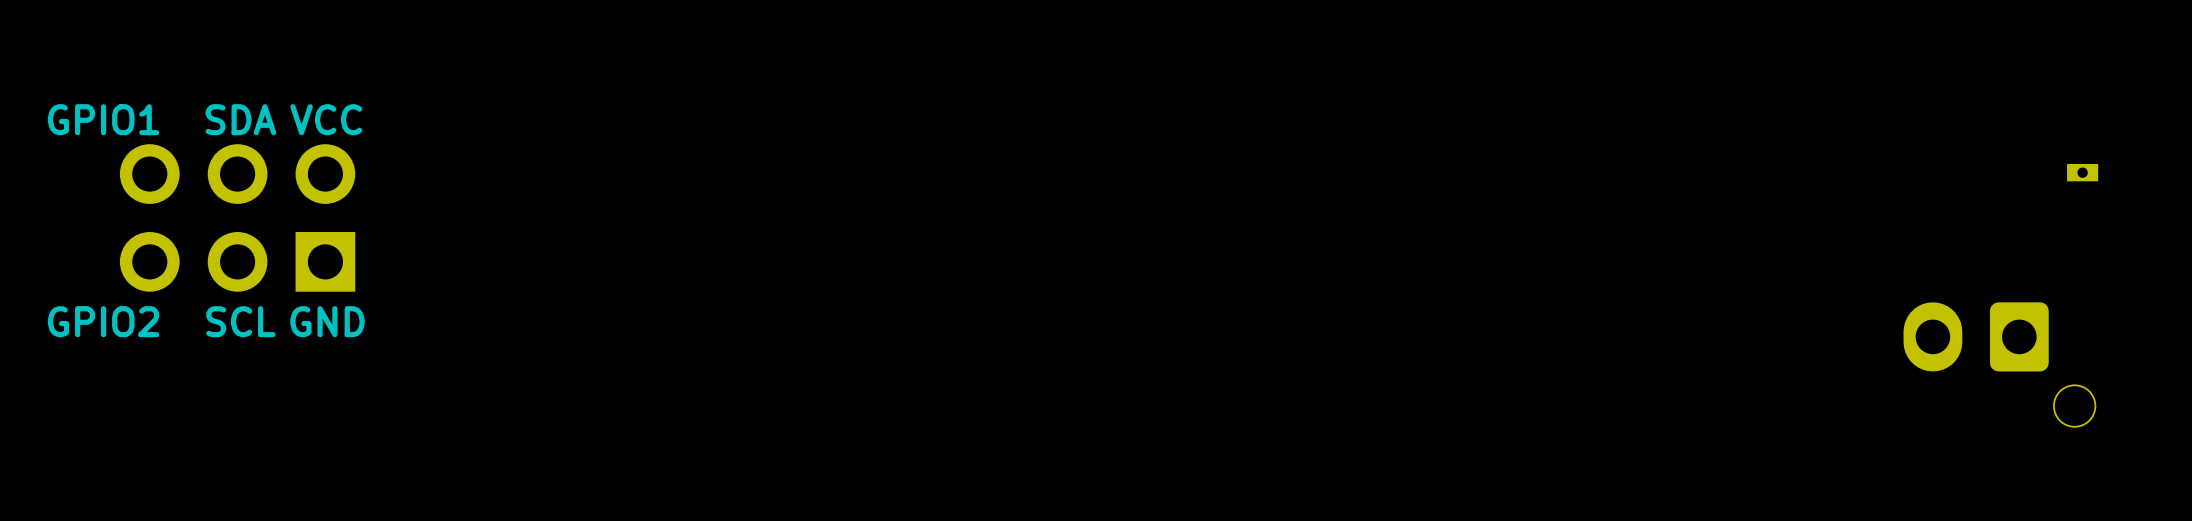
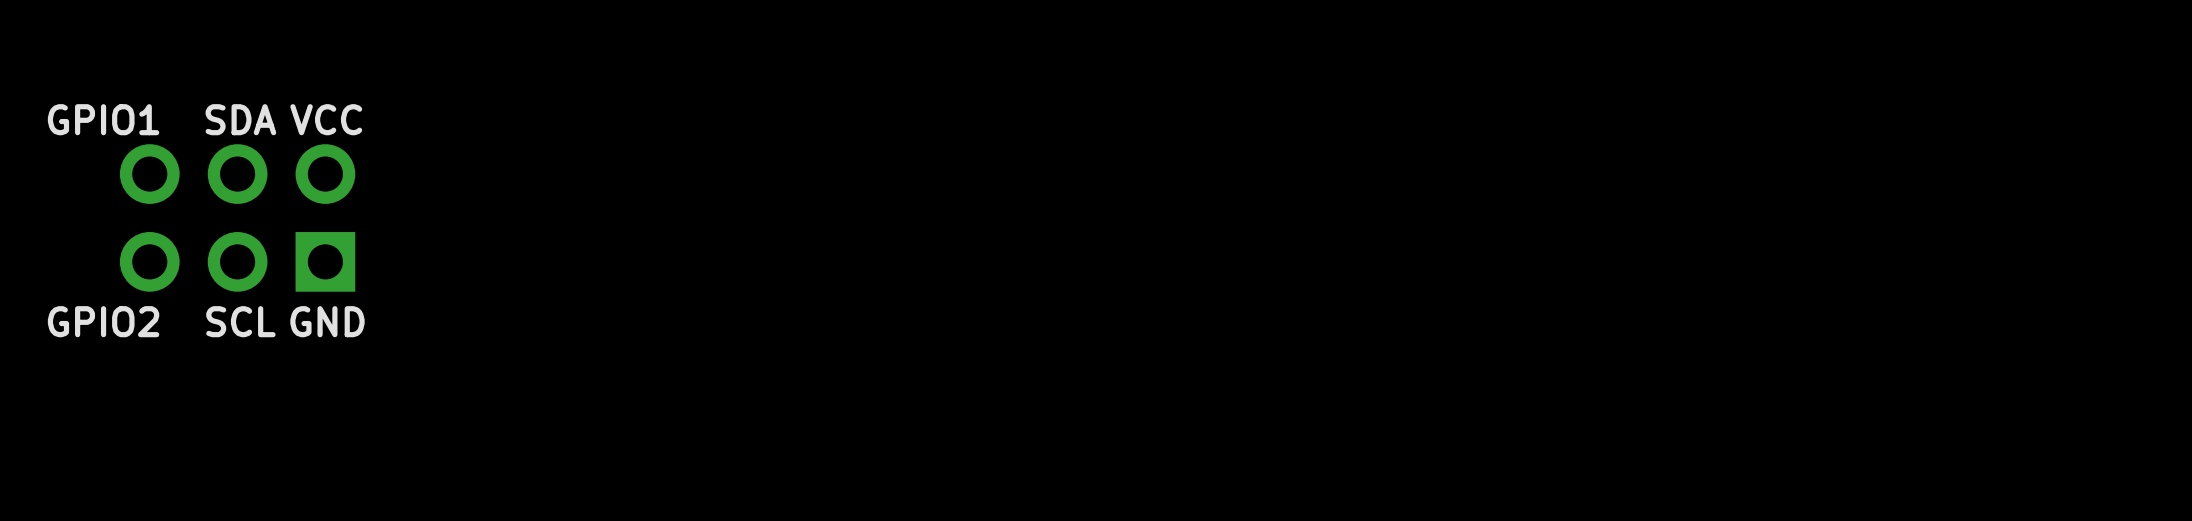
part: (2082, 172) -> none
part: (1999, 364) -> none

